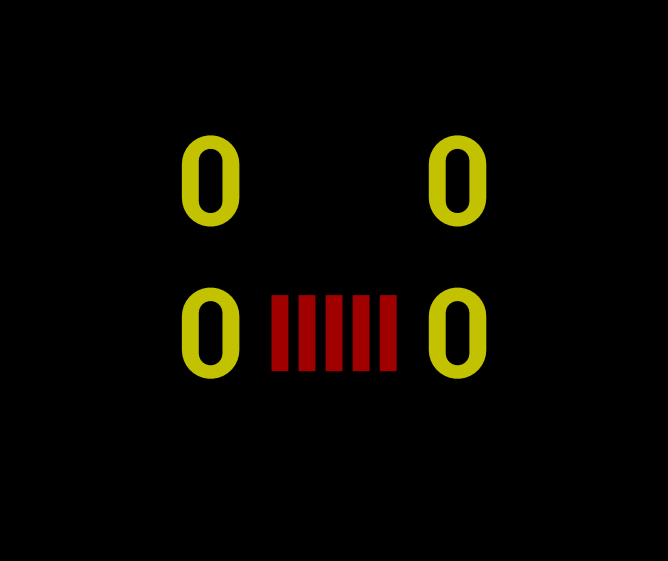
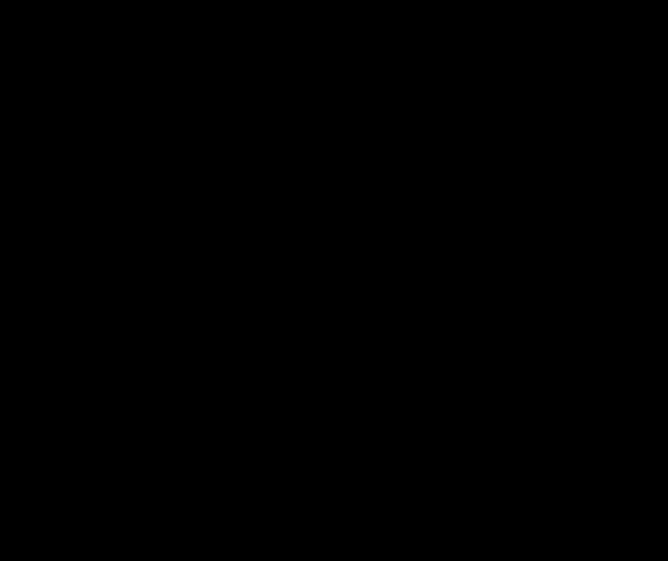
part: (334, 257) -> none

